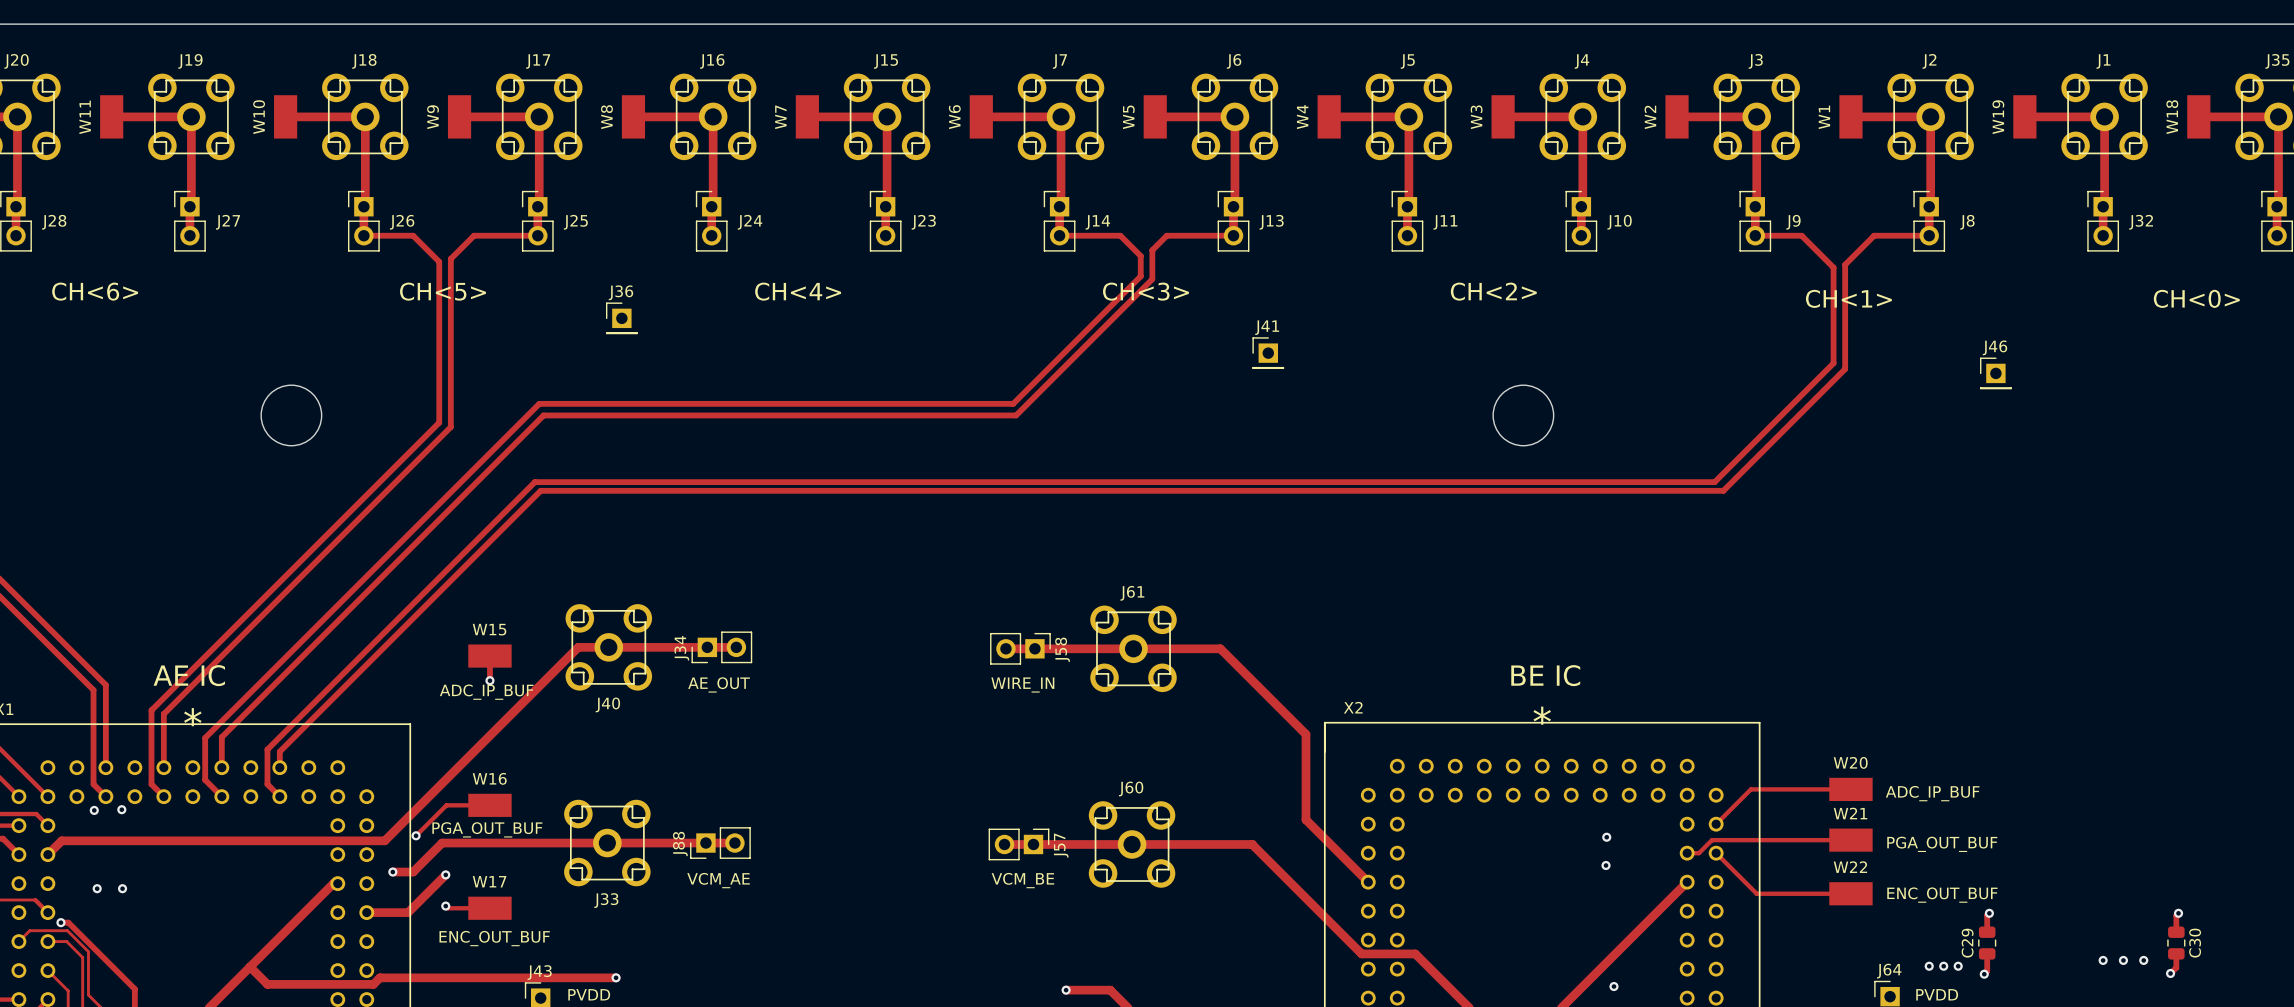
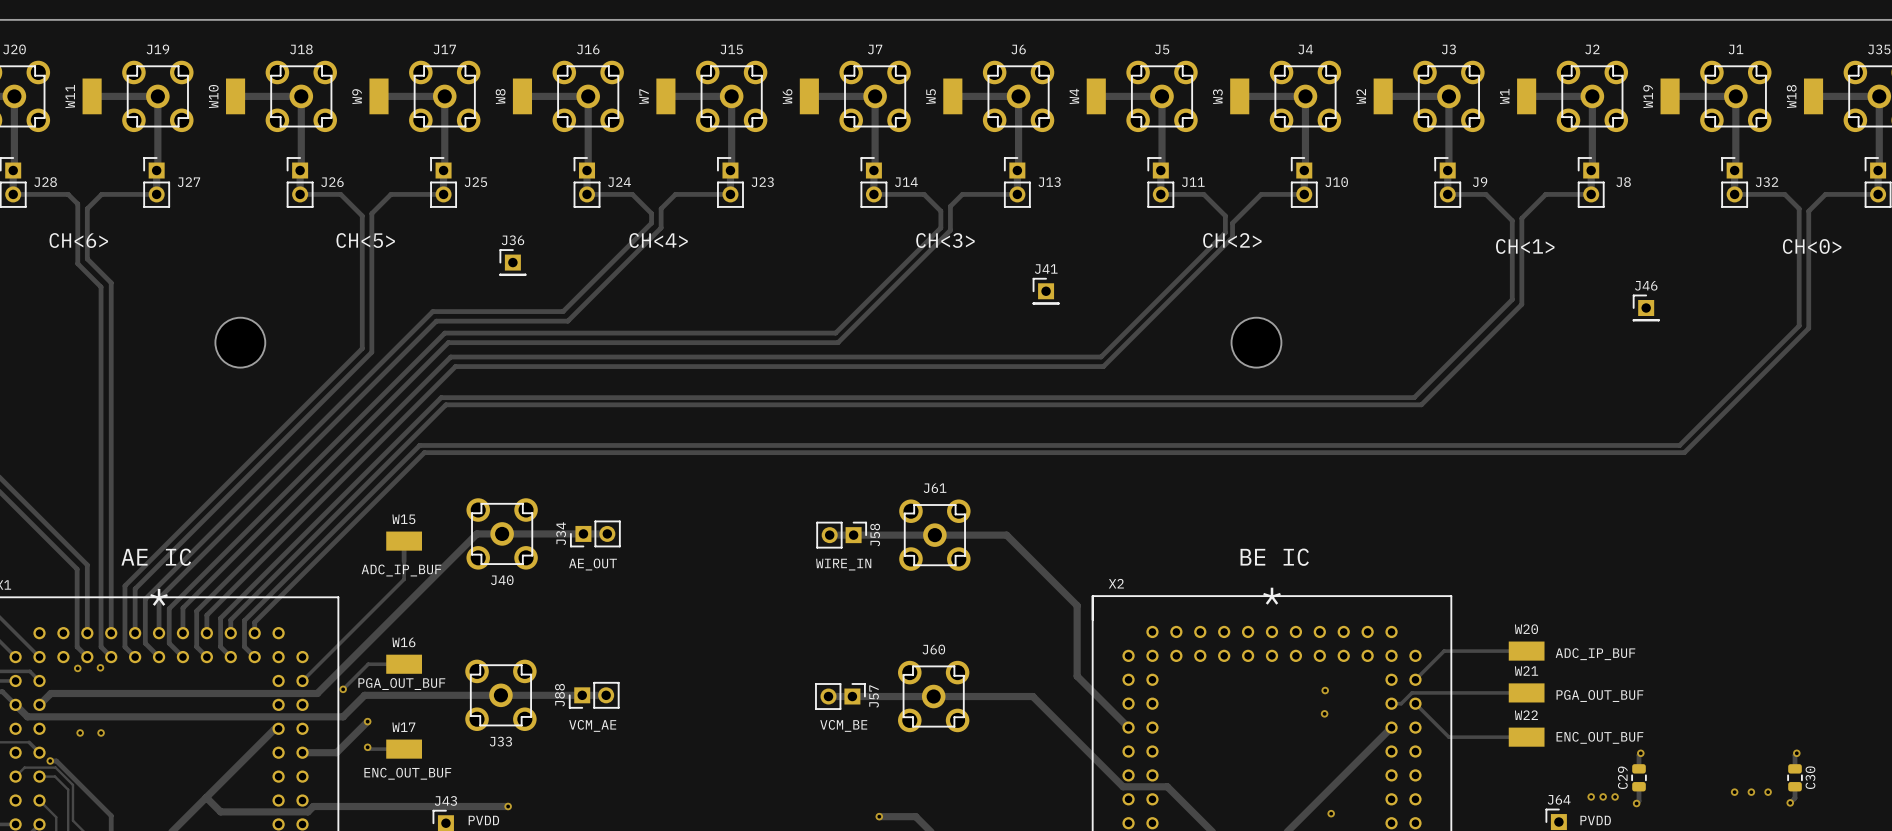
track: none -> (13, 194) (68, 194) (77, 203) (77, 263) (101, 287) (101, 646) (111, 657)
track: none -> (156, 194) (101, 194) (87, 208) (87, 258) (111, 282) (111, 633)
track: none -> (587, 194) (632, 194) (651, 213) (651, 223) (563, 311) (432, 311) (145, 599) (145, 643) (159, 657)
track: none -> (730, 194) (675, 194) (661, 208) (661, 227) (567, 321) (436, 321) (159, 598) (159, 633)
track: none -> (1160, 194) (1203, 194) (1225, 215) (1225, 232) (1101, 357) (450, 357) (196, 611) (196, 646) (206, 657)
track: none -> (1304, 194) (1261, 194) (1232, 223) (1232, 237) (1103, 366) (455, 366) (206, 615) (206, 633)
track: none -> (1734, 194) (1784, 194) (1799, 208) (1799, 325) (1679, 445) (419, 445) (244, 620) (244, 646) (254, 657)
track: none -> (1878, 194) (1825, 194) (1808, 211) (1808, 328) (1684, 452) (424, 452) (254, 622) (254, 633)
track: none -> (404, 561) (404, 579) (302, 680)
via: (489, 680) -> none
track: (416, 869) (413, 872) (392, 872) -> (343, 716) (27, 716) (15, 704)
via: (392, 872) -> none

